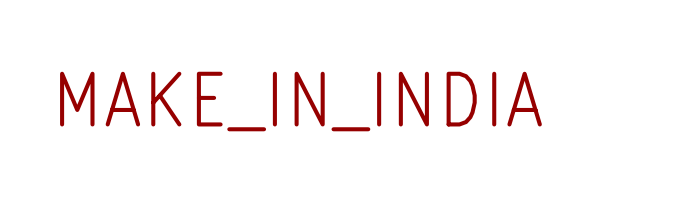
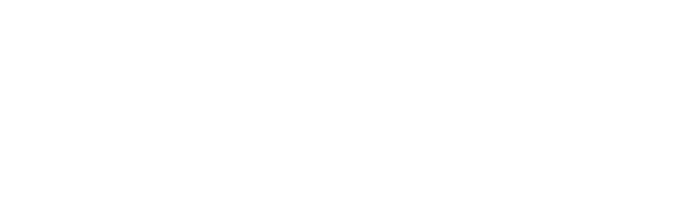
part: (300, 101) -> none

